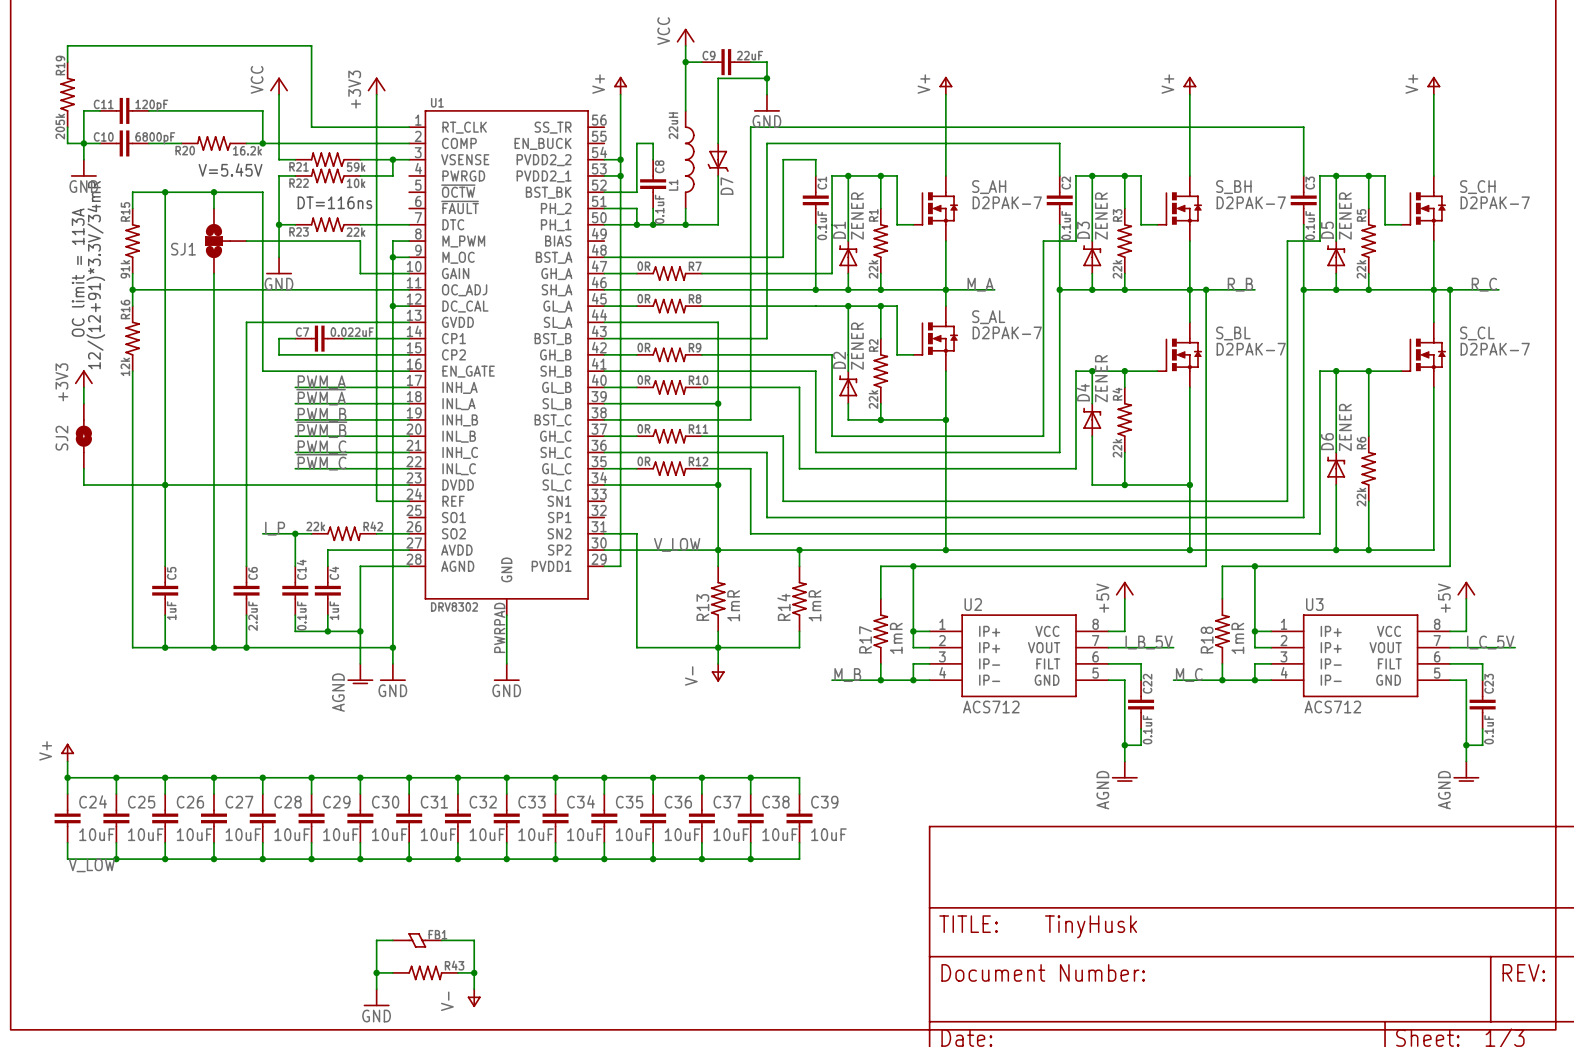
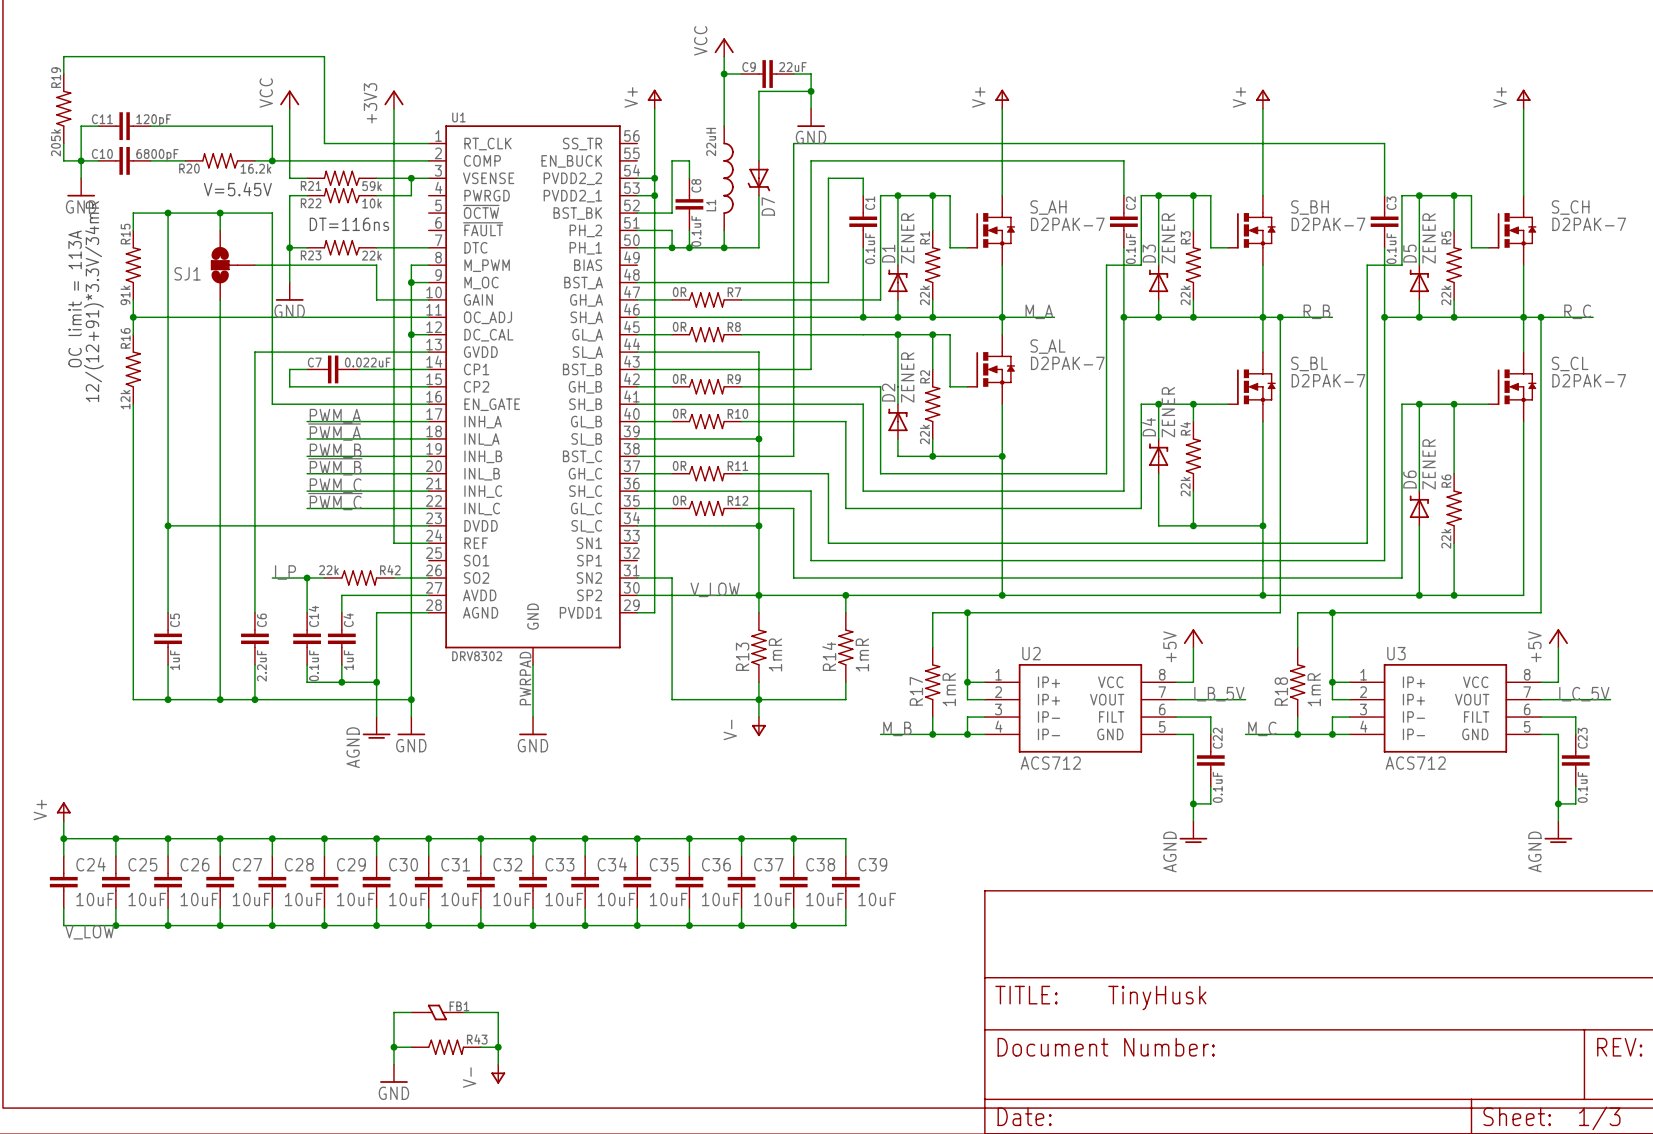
power symbol: +3V3 (83, 378) -> none
wire: (83, 387) (83, 403) -> none
SJ2: (83, 436) -> none
wire: (83, 468) (83, 485) (165, 485) -> none

